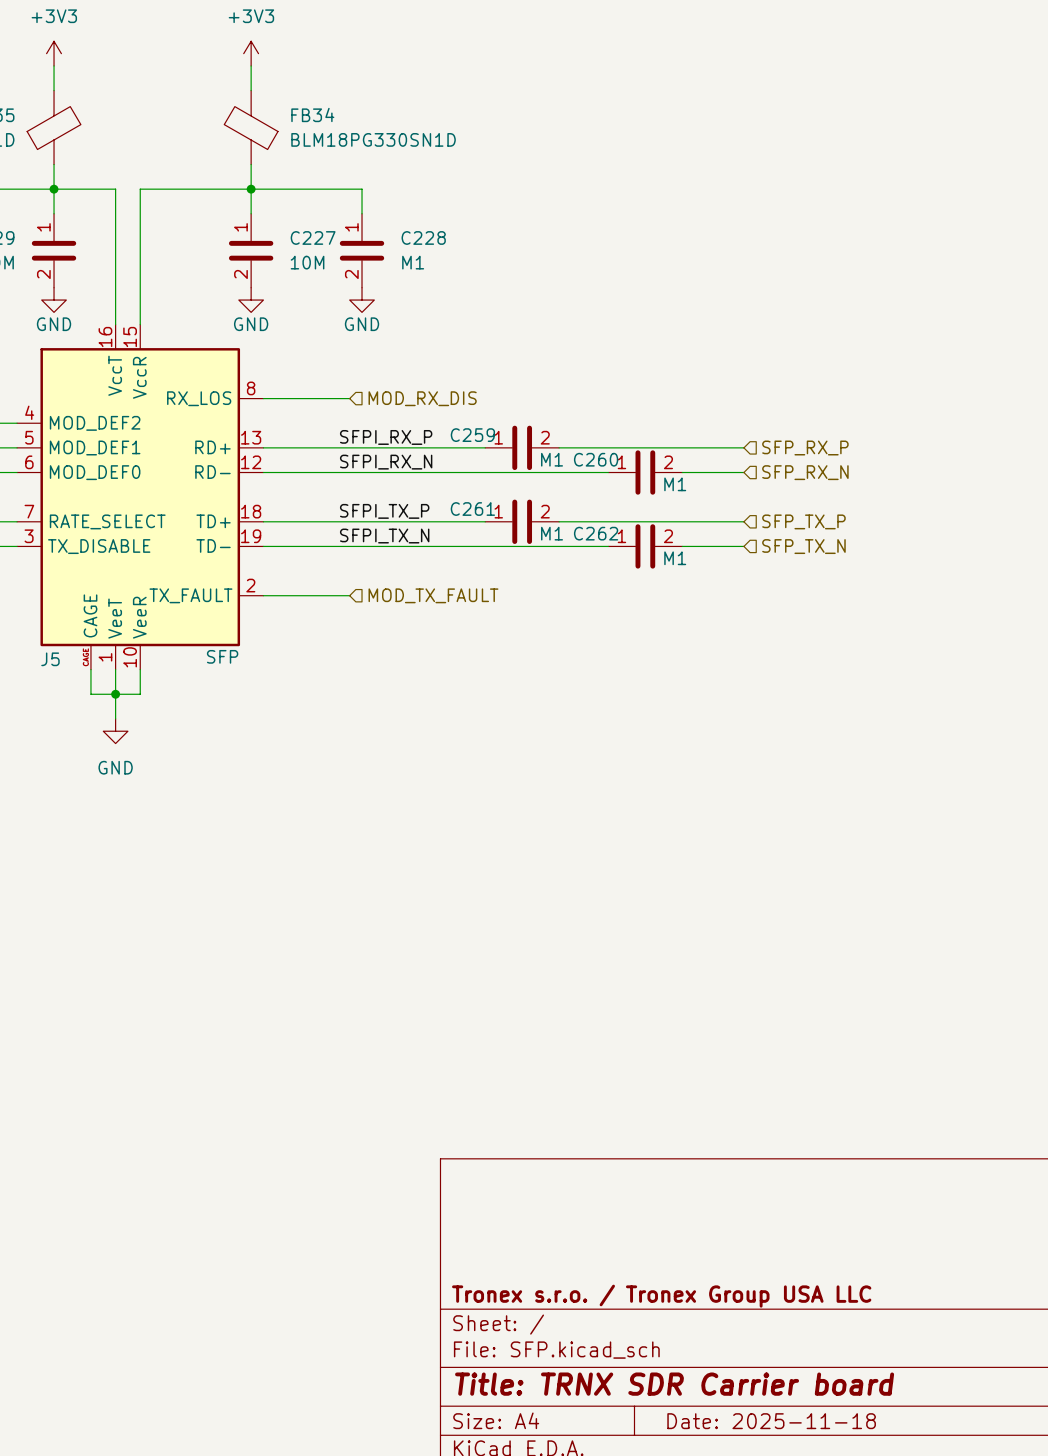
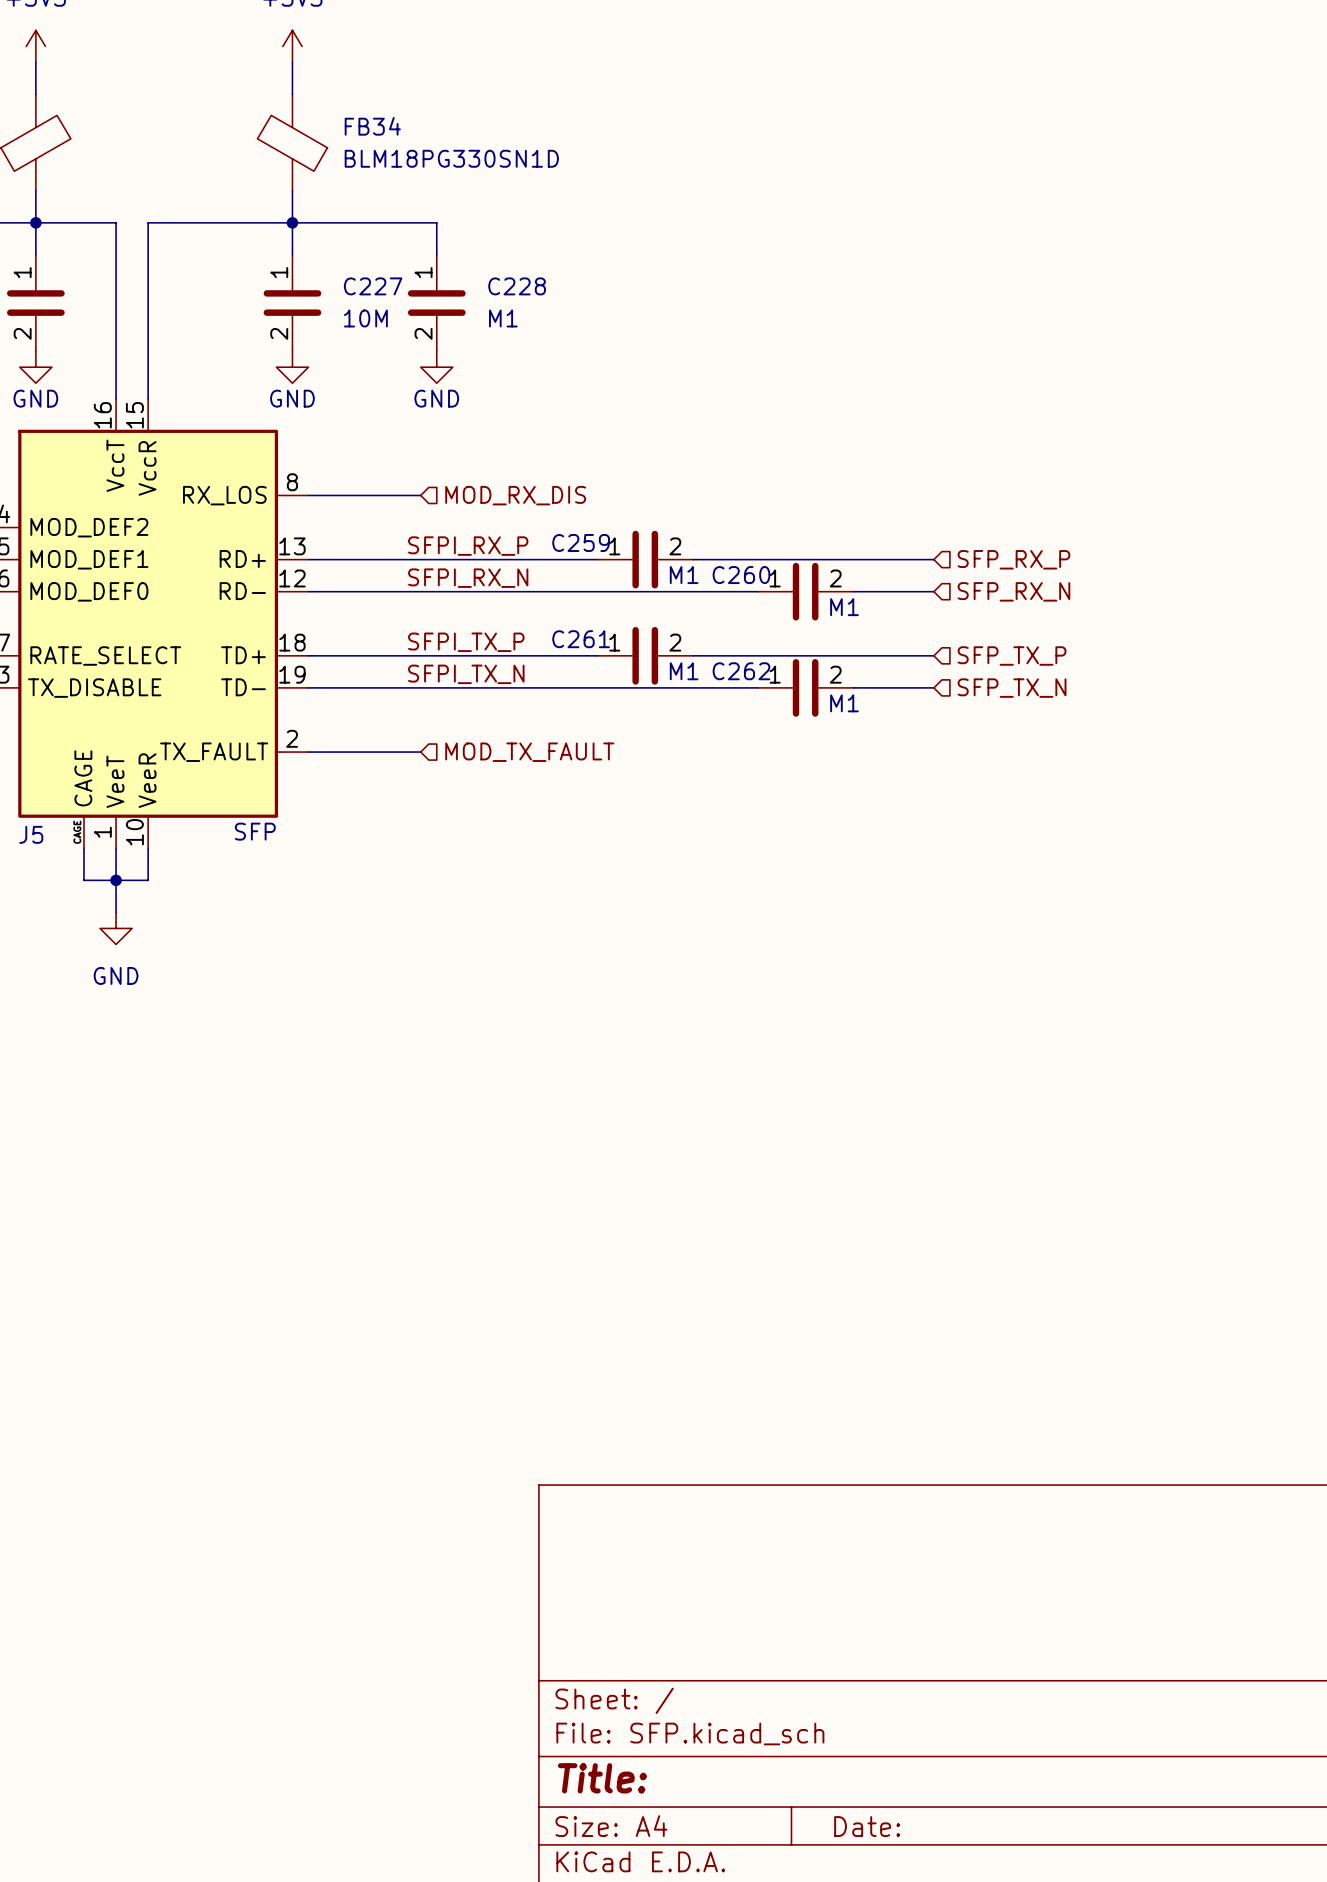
title block: Tronex s.r.o. / Tronex Group USA LLC (661, 1296) -> none
title block: Title: TRNX SDR Carrier board (674, 1384) -> Title: (602, 1778)
title block: Date: 2025-11-18 (771, 1421) -> Date: (867, 1826)

